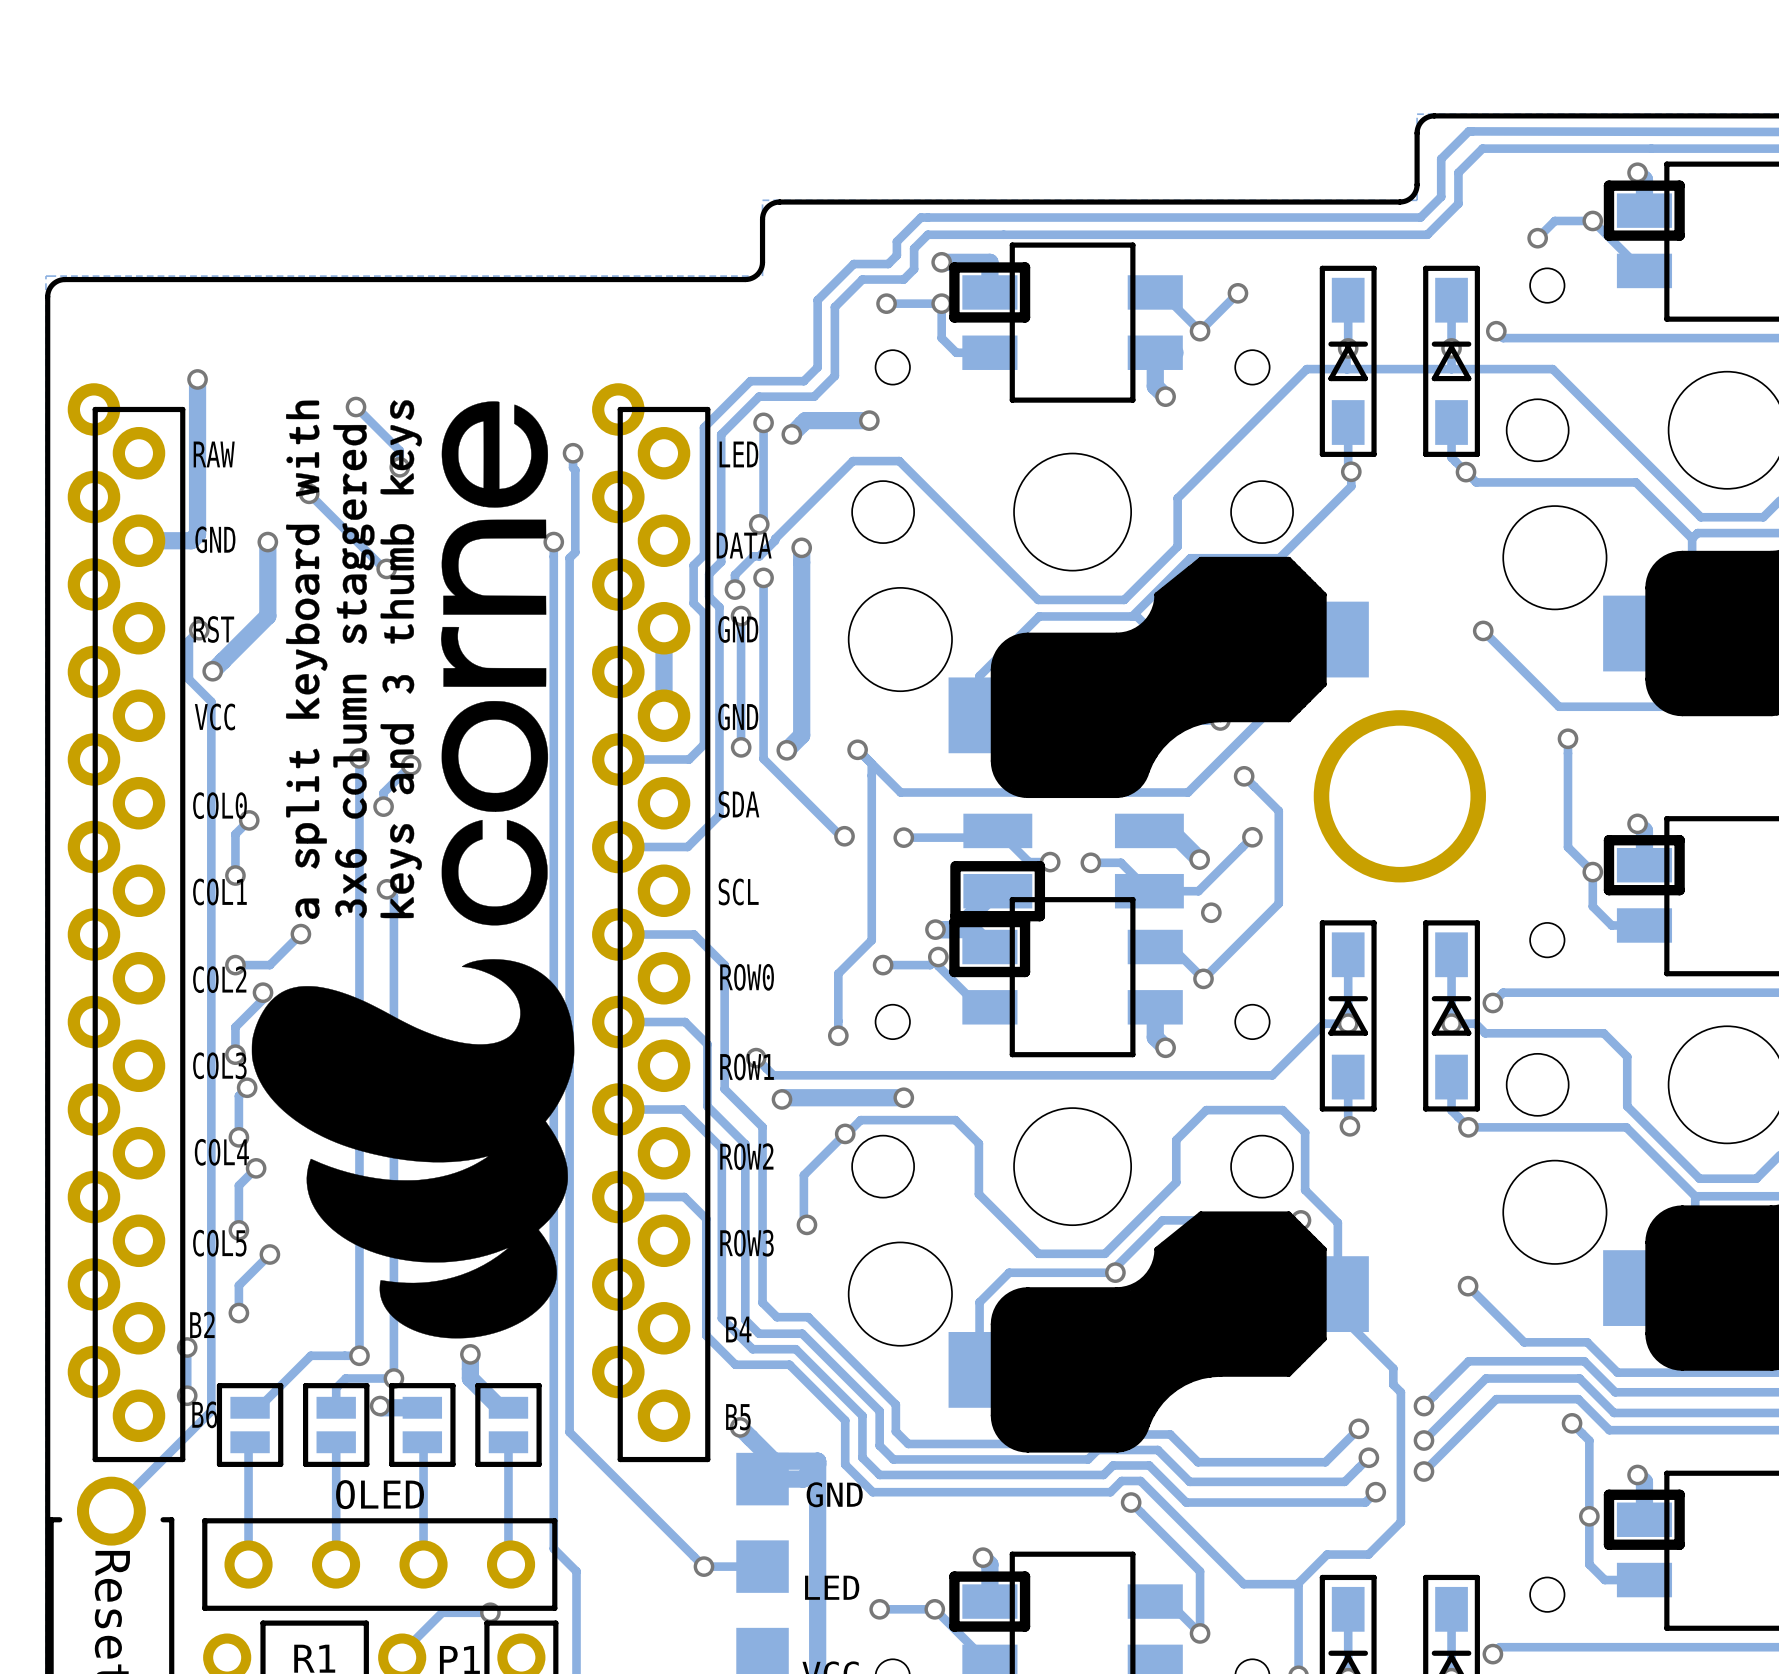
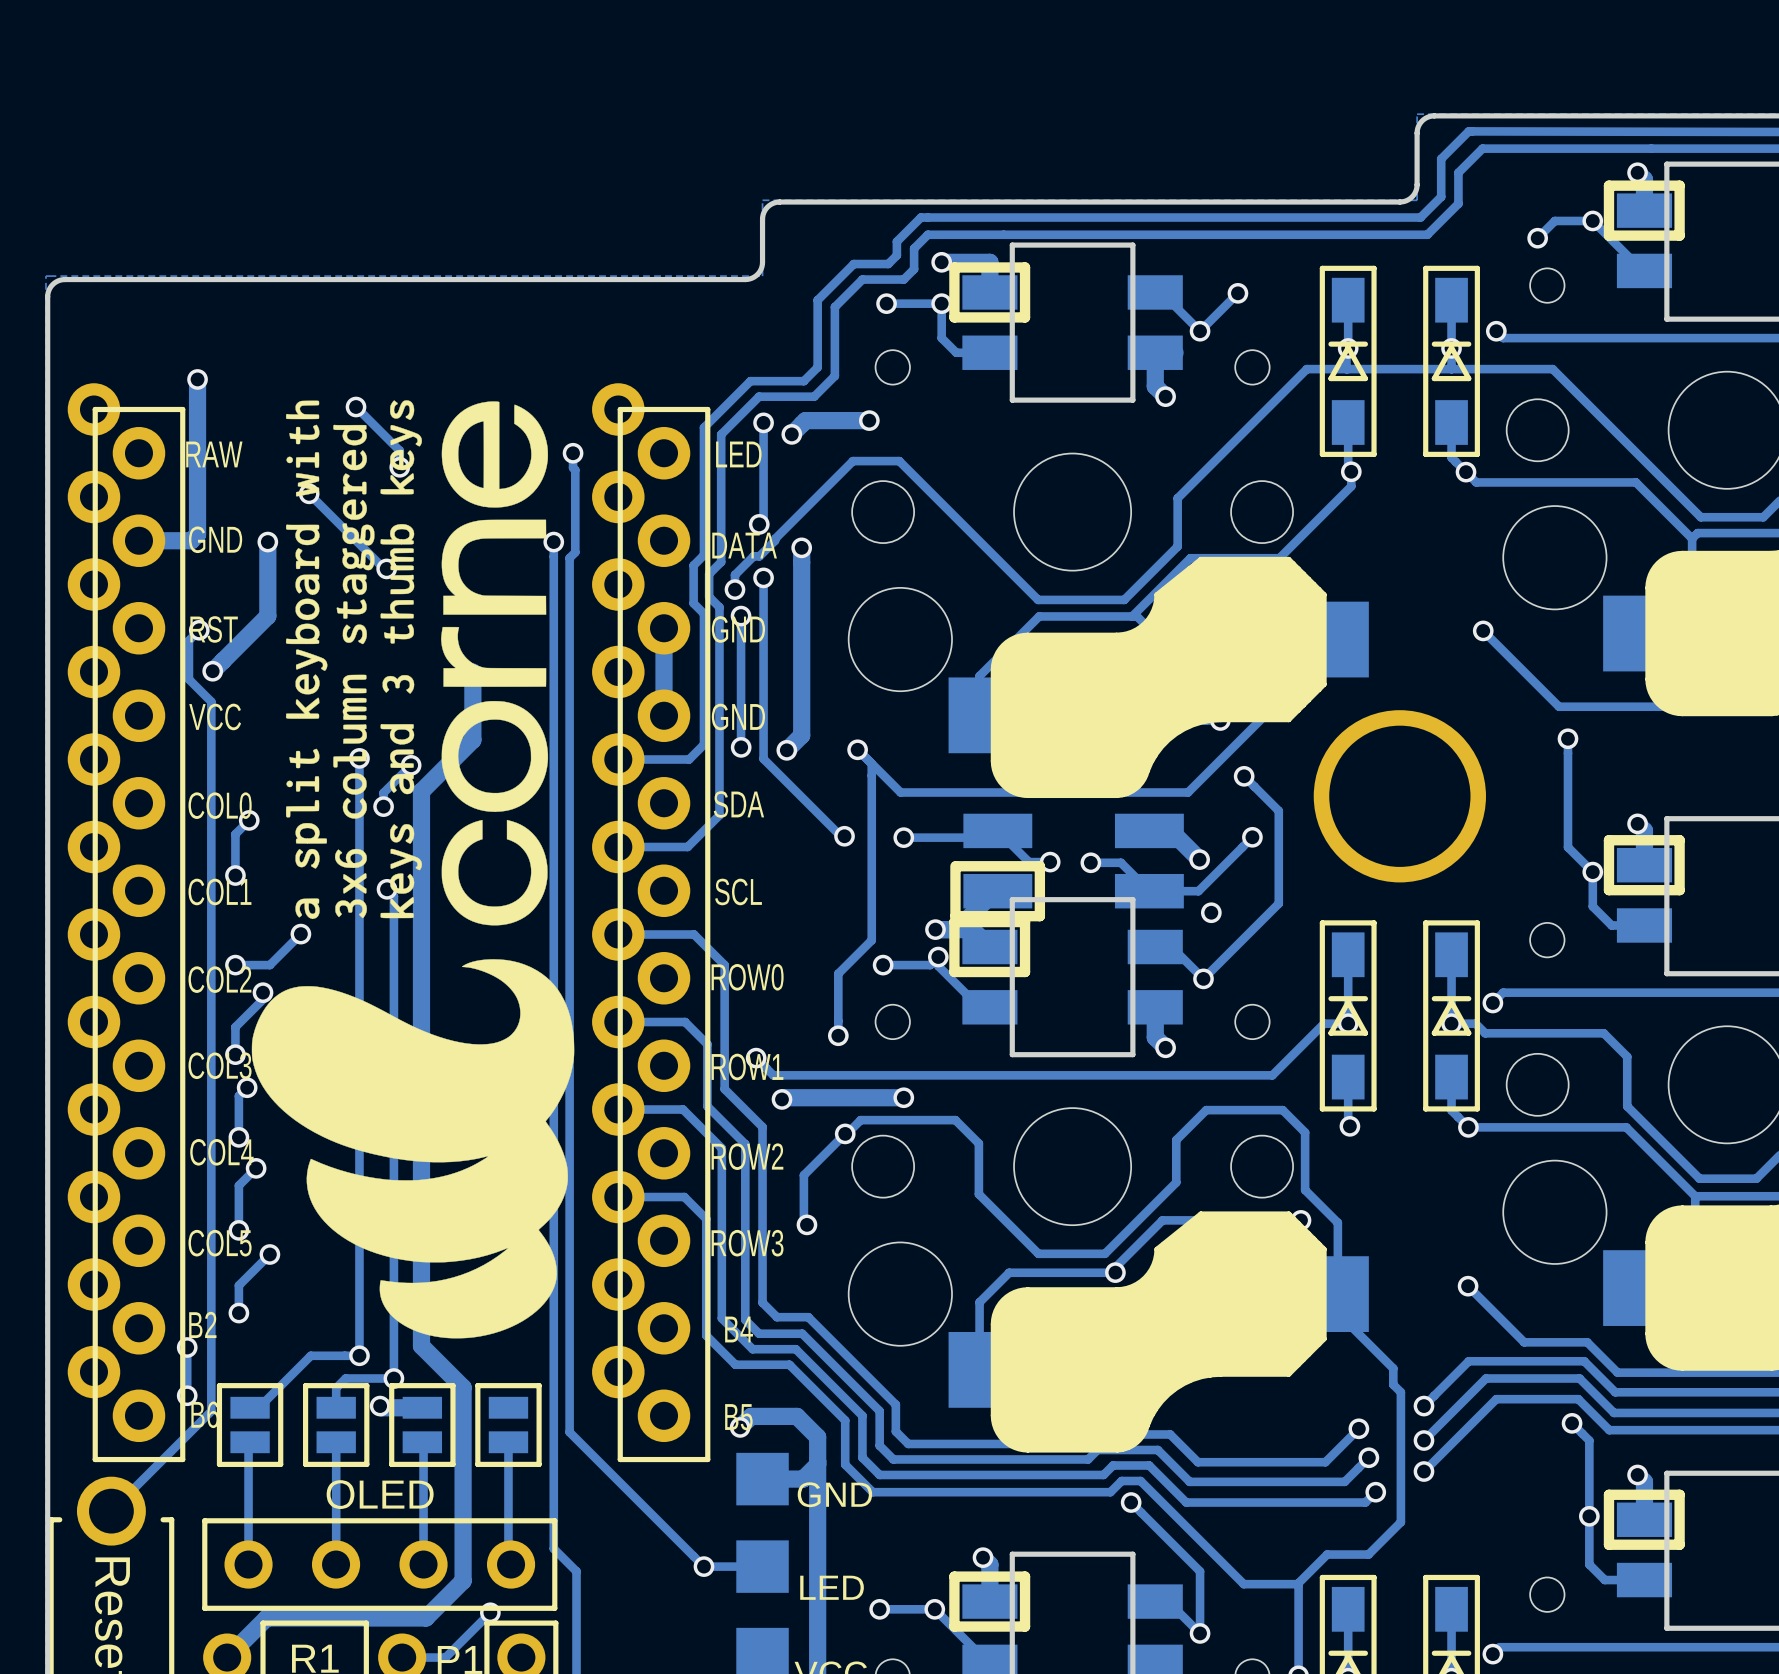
track: none -> (472, 672) (472, 740) (421, 791) (421, 1345) (463, 1387) (463, 1580) (426, 1618) (266, 1618) (227, 1657)
track: (470, 1354) (470, 1378) (499, 1407) (508, 1407) -> none
via: (470, 1354) -> none
track: (740, 1427) (773, 1461) (817, 1461) -> (740, 1427) (751, 1416) (796, 1416) (817, 1437) (817, 1461)
track: (490, 1612) (442, 1612) (402, 1652) (402, 1657) -> (490, 1612) (445, 1657) (402, 1657)

